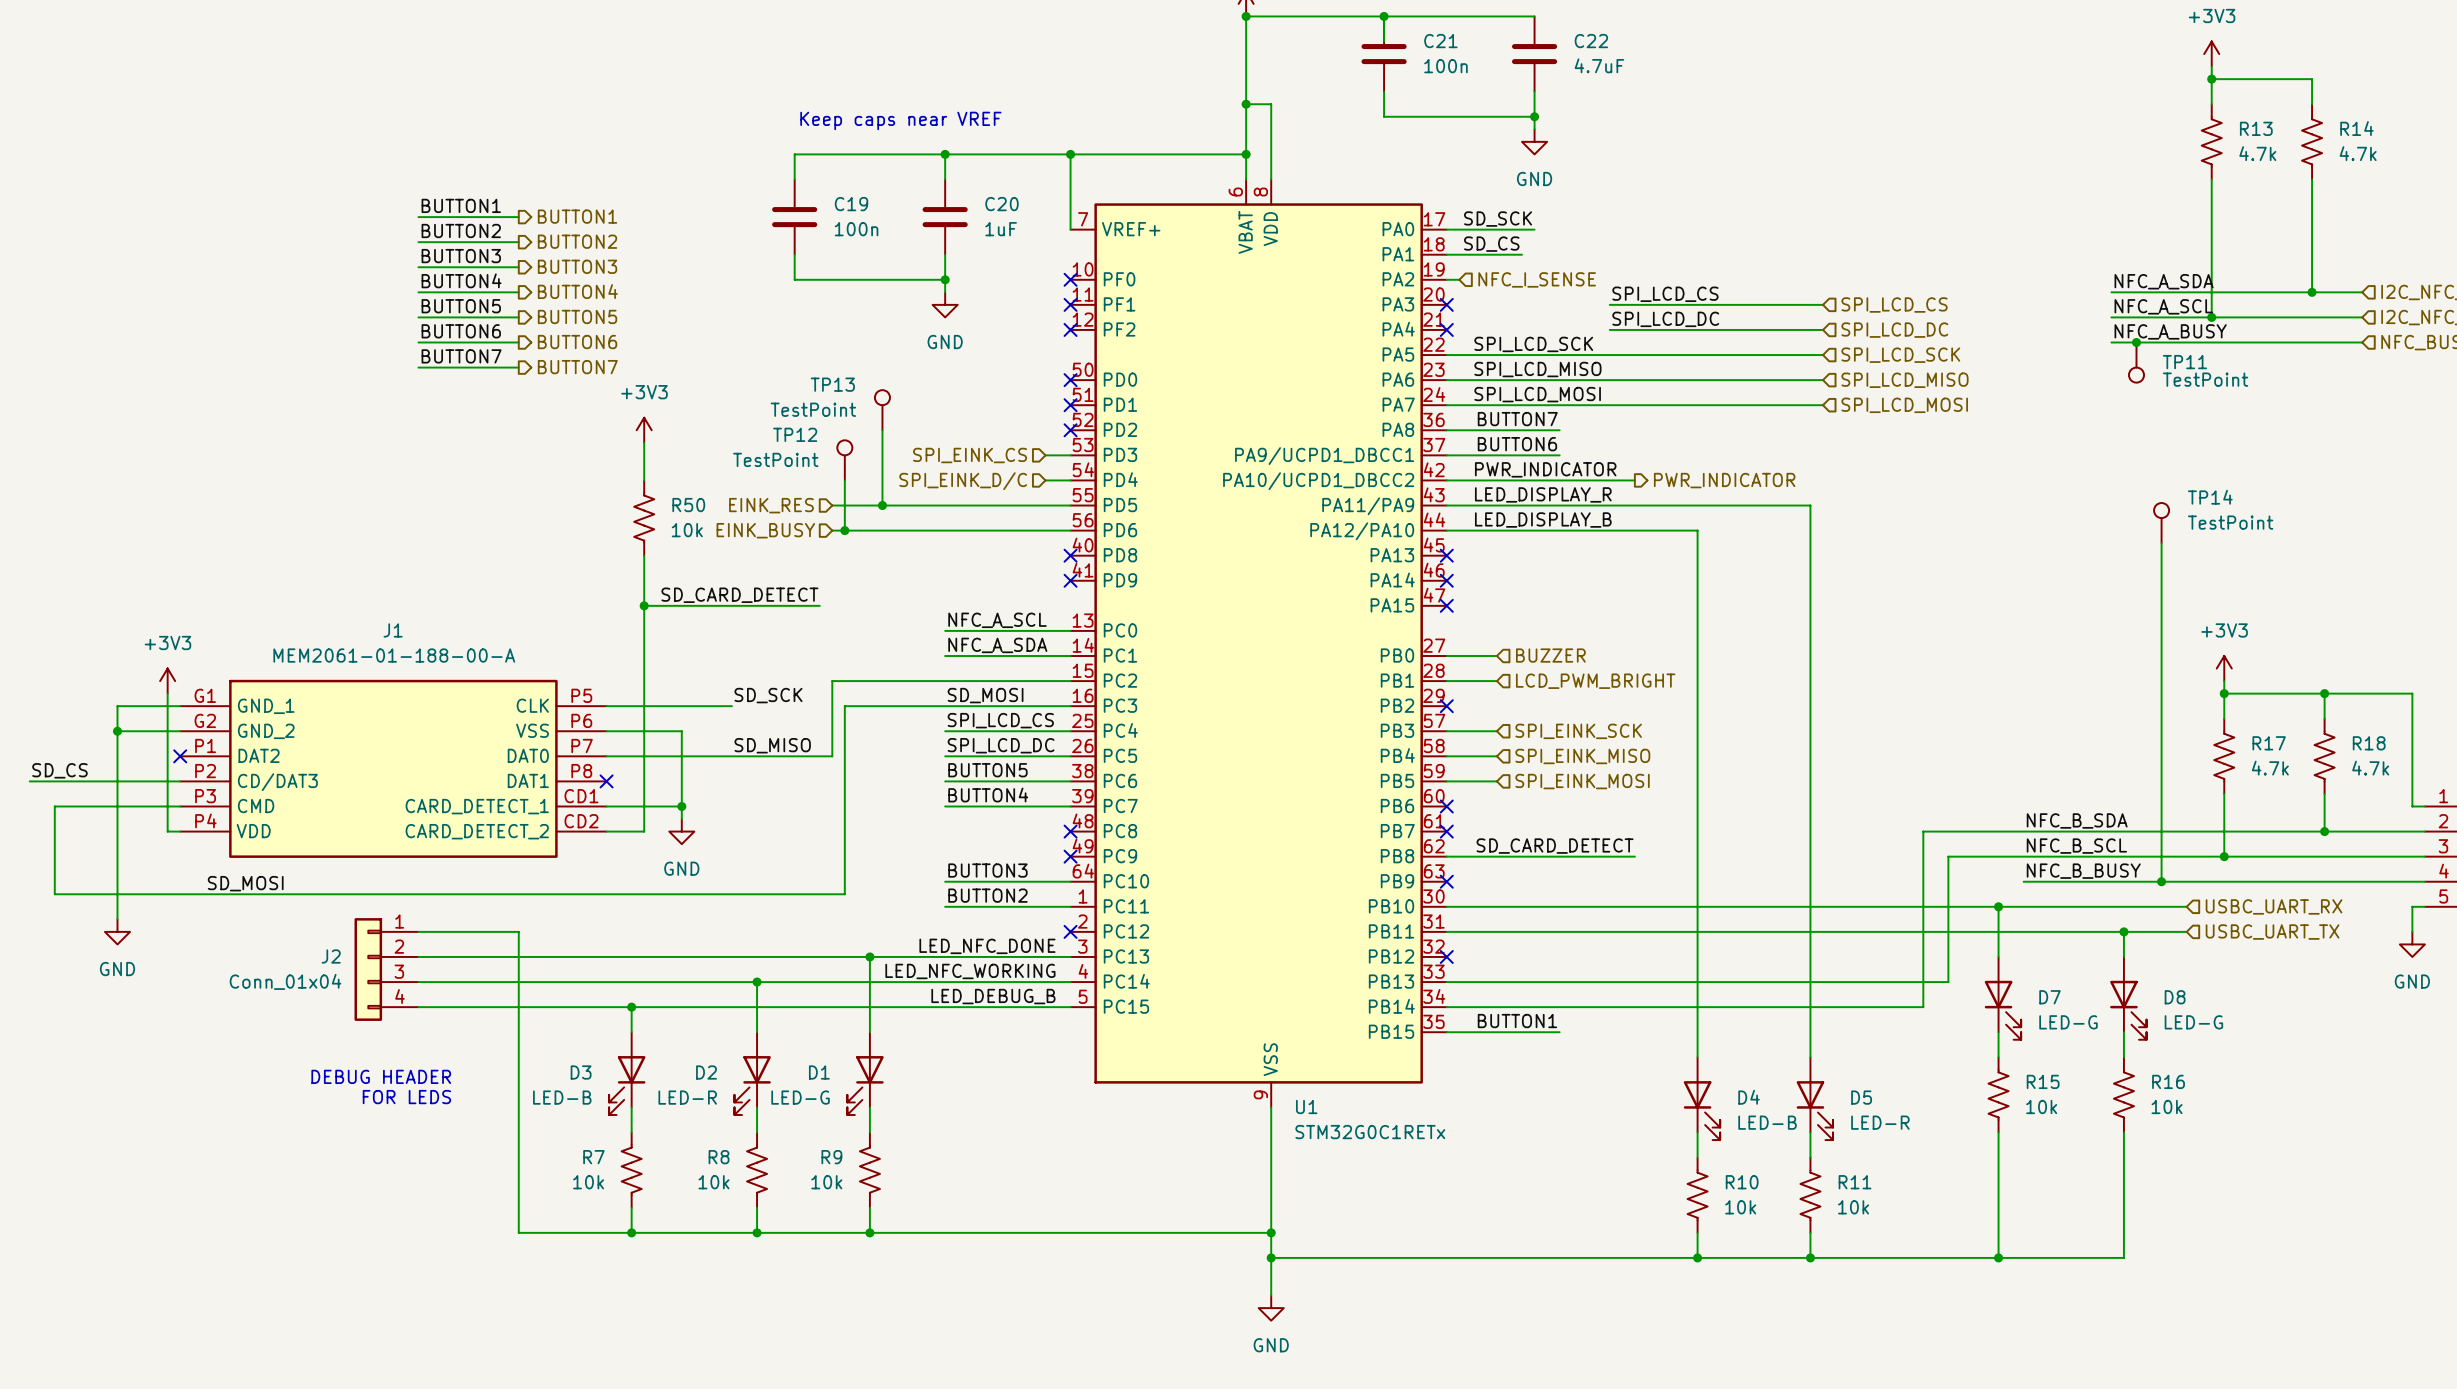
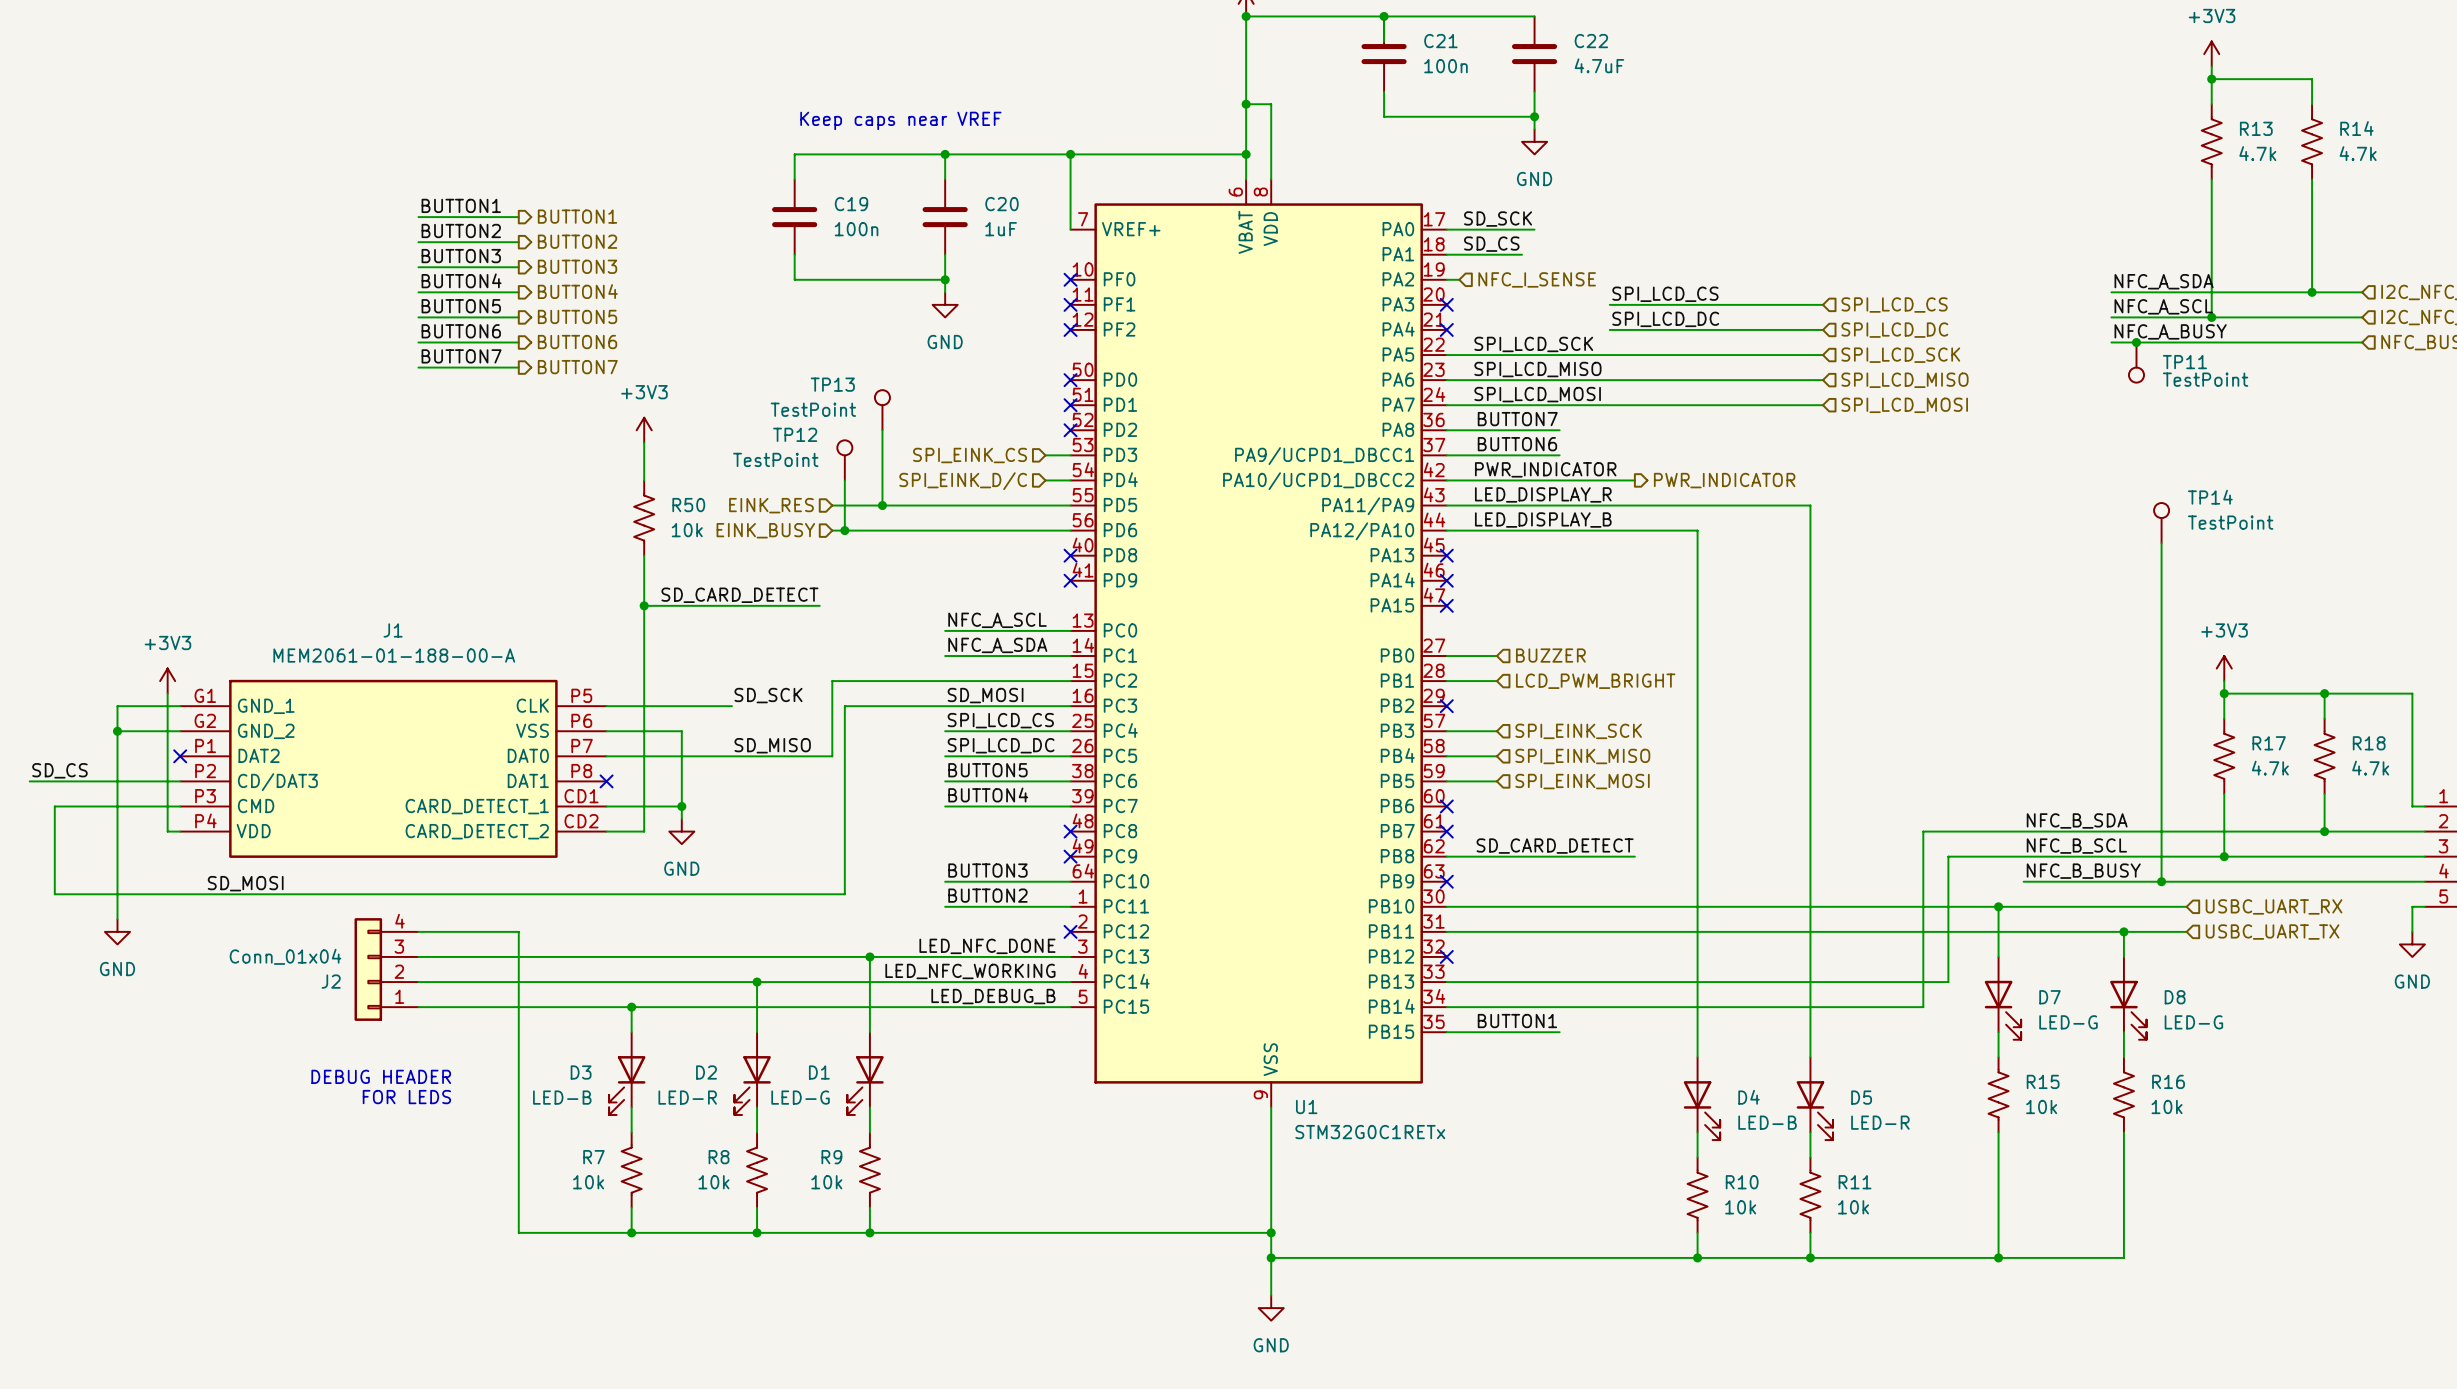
J2 flip: as is (368, 969) -> up-down (368, 969)

